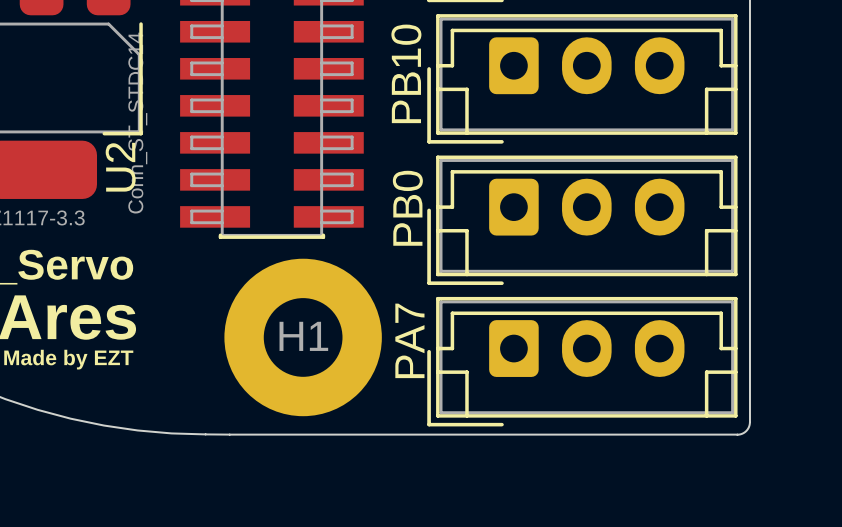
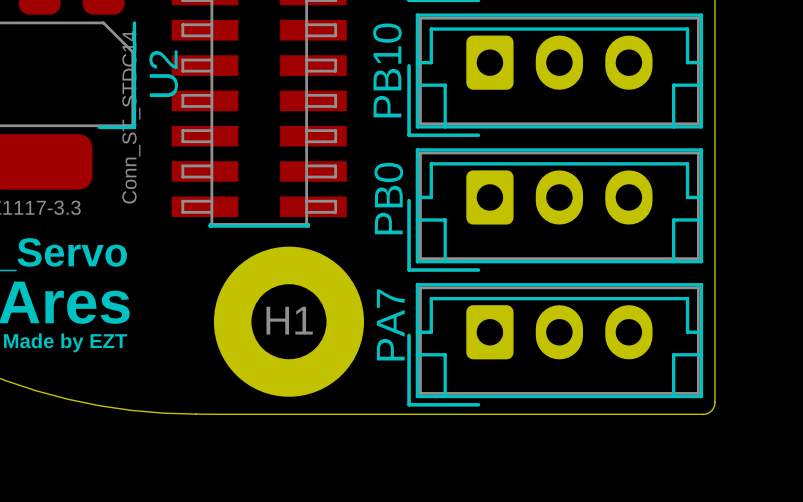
U2 name position: U2 (120, 167) -> U2 (163, 73)

